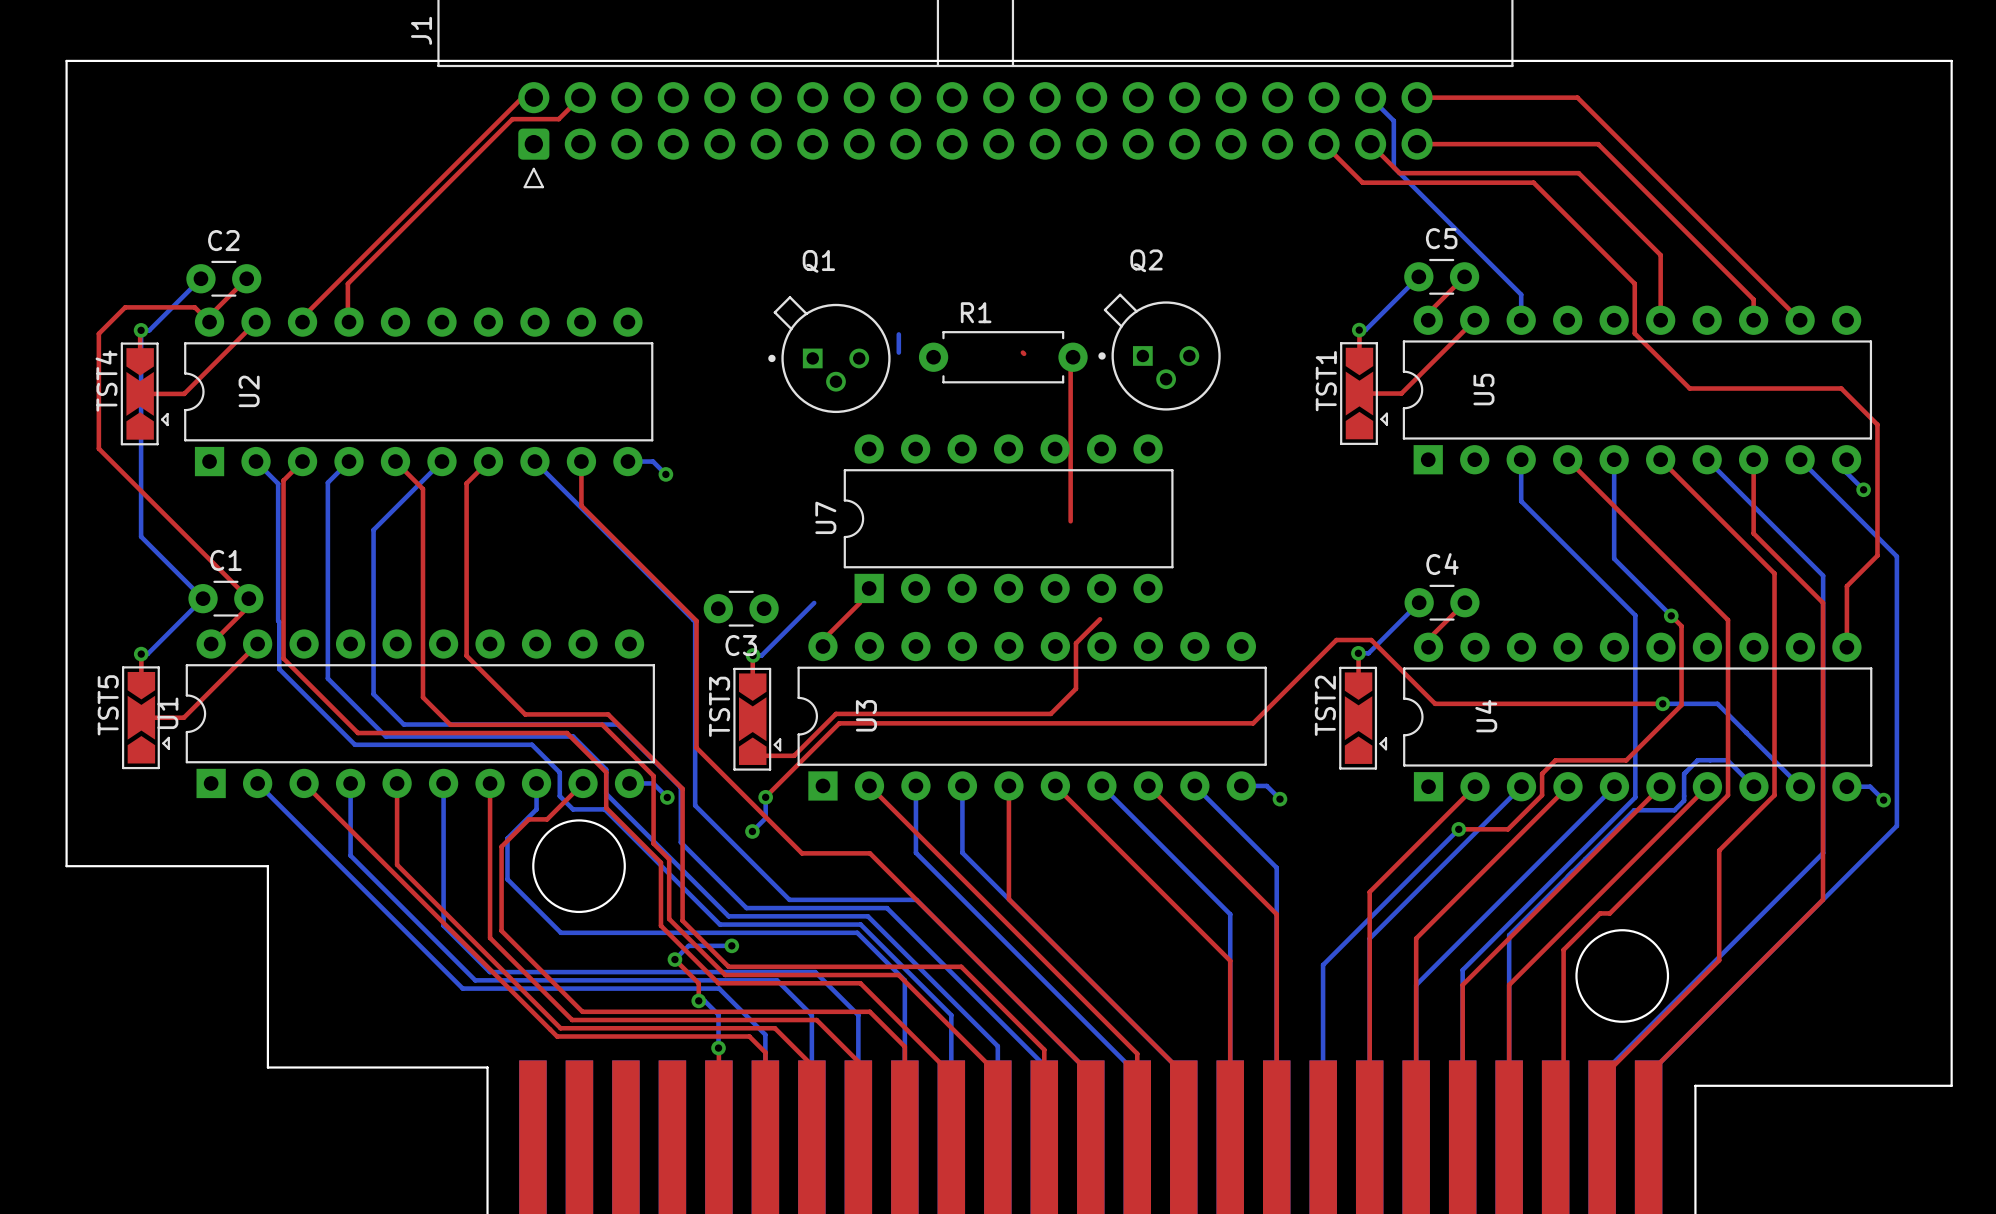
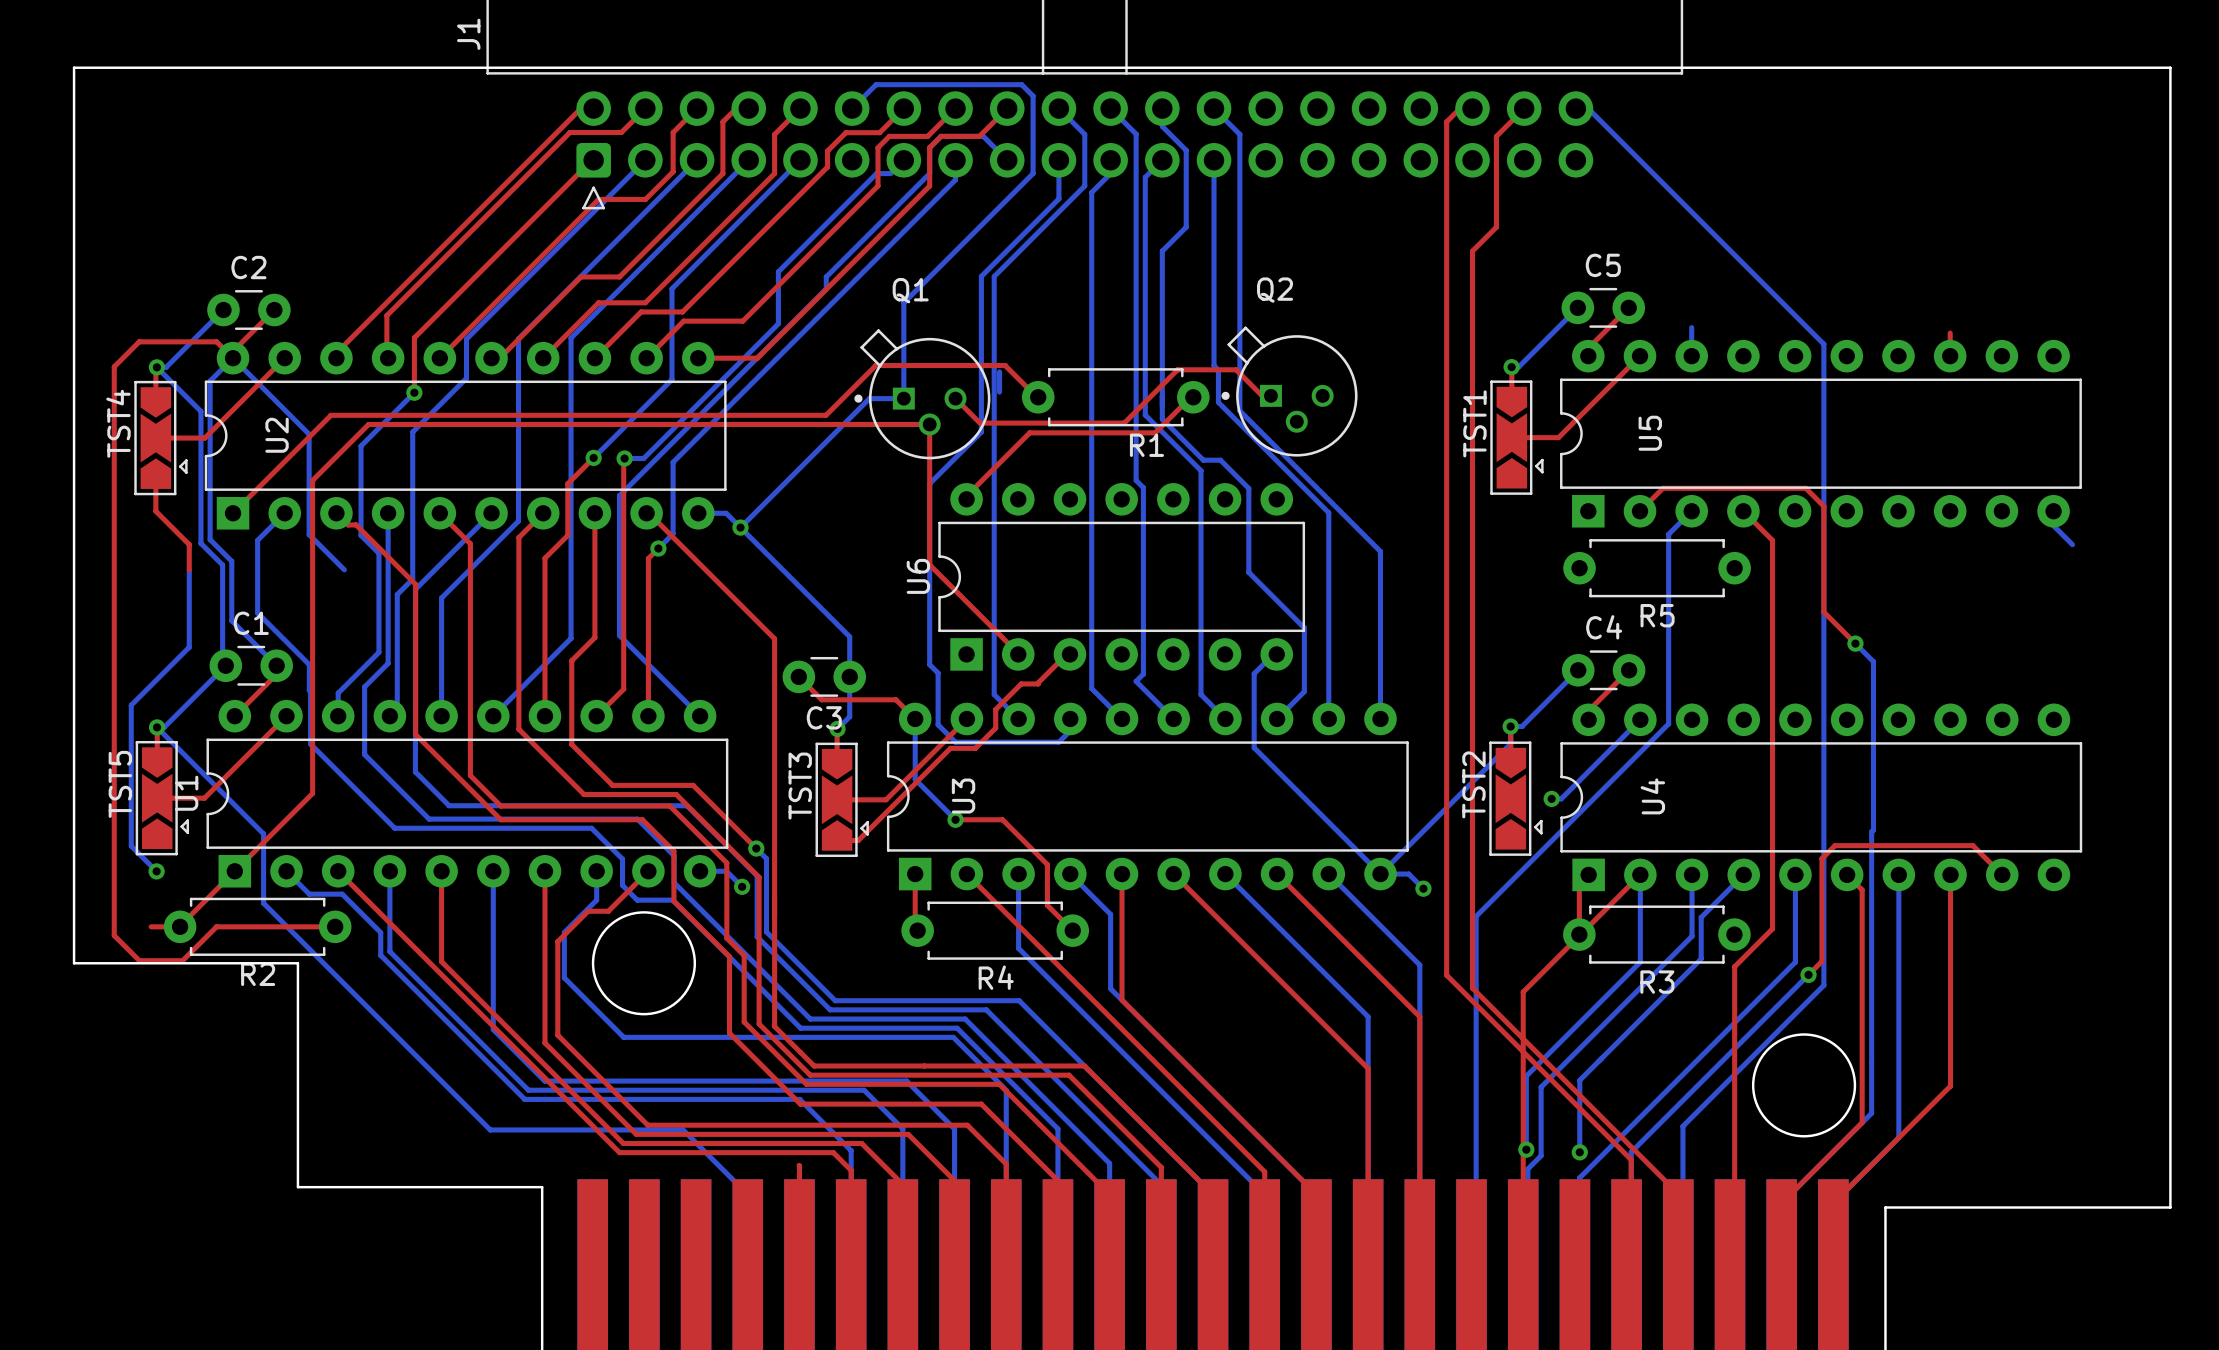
top track: none -> (697, 108) (673, 132) (673, 171) (645, 199) (598, 199) (439, 358)
top track: none -> (748, 108) (736, 108) (722, 121) (722, 173) (619, 276) (580, 276) (499, 358) (491, 358)
top track: none -> (800, 108) (774, 134) (774, 173) (645, 302) (598, 302) (543, 358)
top track: none -> (903, 108) (879, 132) (845, 132) (827, 151) (827, 166) (682, 311) (641, 311) (594, 358)
top track: none -> (955, 108) (927, 136) (889, 136) (877, 147) (877, 185) (742, 321) (683, 321) (646, 358)
top track: none -> (1007, 108) (979, 136) (941, 136) (929, 147) (929, 185) (757, 358) (698, 358)
bottom track: none -> (1058, 108) (1084, 134) (1084, 185) (994, 276) (994, 694) (1018, 718)
bottom track: none -> (1110, 108) (1136, 134) (1136, 480) (1143, 487) (1143, 674) (1136, 681) (1173, 718)
bottom track: none -> (1162, 108) (1162, 126) (1186, 150) (1186, 227) (1162, 251) (1162, 419) (1203, 460) (1220, 460) (1248, 488) (1248, 572) (1304, 627) (1304, 691) (1277, 718)
bottom track: none -> (1214, 108) (1239, 134) (1239, 410) (1380, 551) (1380, 718)
top track: none -> (1472, 108) (1459, 108) (1446, 121) (1446, 975) (1631, 1159) (1631, 1295)
top track: none -> (1524, 108) (1496, 136) (1496, 227) (1472, 251) (1472, 988) (1682, 1198) (1682, 1295)
bottom track: (1370, 97) (1393, 120) (1393, 167) (1521, 294) -> none
top track: (1417, 97) (1577, 97) (1800, 320) -> none
bottom track: none -> (1575, 108) (1588, 108) (1823, 344) (1823, 985) (1682, 1126) (1682, 1295)
top track: none -> (593, 160) (414, 337) (414, 392)
bottom track: none -> (645, 160) (466, 339) (466, 378) (412, 432) (412, 579) (397, 594) (397, 708) (389, 716)
bottom track: none -> (697, 160) (518, 338) (518, 521) (441, 598) (441, 716)
bottom track: none -> (748, 160) (571, 338) (571, 638) (493, 716)
bottom track: none -> (800, 160) (672, 288) (672, 379) (593, 457)
bottom track: none -> (903, 160) (890, 173) (876, 173) (778, 271) (778, 323) (643, 458) (624, 458)
bottom track: none -> (955, 160) (955, 179) (673, 462) (673, 533) (658, 548)
bottom track: none -> (1007, 160) (983, 136) (941, 136) (929, 147) (929, 173) (826, 276) (826, 288) (619, 495) (619, 635) (700, 716)
bottom track: none -> (1058, 160) (1058, 198) (981, 276) (981, 432) (929, 483) (929, 664) (938, 673) (938, 724) (955, 742) (1058, 742) (1070, 730) (1070, 718)
bottom track: none -> (1110, 160) (1110, 173) (1091, 192) (1091, 688) (1122, 718)
bottom track: none -> (1162, 160) (1145, 177) (1145, 415) (1201, 470) (1201, 694) (1225, 718)
bottom track: none -> (1214, 160) (1214, 365) (1218, 370) (1218, 402) (1328, 512) (1328, 718)
top track: (1324, 144) (1362, 182) (1533, 182) (1634, 283) (1634, 333) (1689, 388) (1841, 388) (1877, 424) (1877, 555) (1846, 586) (1846, 647) -> none
top track: (1370, 144) (1399, 173) (1578, 173) (1660, 255) (1660, 320) -> none
top track: (1417, 144) (1598, 144) (1753, 299) -> none
R1 name position: R1 (976, 312) -> R1 (1146, 445)
top track: (102, 329) (98, 333) (98, 448) (248, 598) -> (114, 366) (114, 935) (139, 960) (182, 960) (216, 926) (335, 926)
bottom track: (141, 330) (141, 536) (200, 595) -> (156, 367) (200, 411) (200, 543) (222, 565) (222, 662)
top track: (1022, 352) (1024, 353) -> none
bottom track: none -> (414, 392) (361, 446) (361, 535) (378, 553) (378, 652) (338, 693) (338, 716)
via: none -> (414, 392)
top track: (1070, 353) (1070, 521) -> none
top track: none -> (1270, 395) (1262, 395) (1236, 369) (1177, 369) (1124, 423) (980, 423) (955, 398)
top track: none -> (1036, 396) (1005, 365) (875, 365) (826, 415) (331, 415) (233, 513)
top track: none -> (1191, 396) (1155, 432) (1029, 432) (965, 497)
top track: none -> (593, 457) (567, 483) (567, 535) (544, 558) (544, 716)
via: none -> (593, 457)
top track: none -> (624, 458) (623, 689) (596, 716)
via: none -> (624, 458)
top track: none -> (155, 478) (155, 511) (189, 544) (189, 569)
top track: none -> (1640, 511) (1662, 488) (1805, 488) (1823, 506) (1823, 612) (1855, 643)
bottom track: (1521, 459) (1521, 501) (1635, 615) (1635, 797) (1462, 970) (1462, 1161) -> (1691, 511) (1668, 534) (1668, 723) (1476, 916) (1476, 1295)
bottom track: (1614, 459) (1614, 558) (1671, 615) -> none
top track: (1660, 459) (1774, 573) (1774, 795) (1719, 850) (1719, 960) (1602, 1077) (1602, 1161) -> none
bottom track: (1707, 459) (1823, 575) (1823, 853) (1602, 1074) (1602, 1161) -> none
top track: (1753, 459) (1753, 533) (1823, 602) (1823, 899) (1648, 1074) (1648, 1161) -> none
bottom track: (1800, 459) (1896, 556) (1896, 825) (1648, 1074) (1648, 1161) -> none
bottom track: (256, 461) (278, 483) (278, 597) -> (284, 513) (257, 540) (257, 612) (309, 664)
top track: (302, 461) (283, 480) (283, 658) (358, 733) (566, 733) (606, 772) (606, 807) (660, 862) (660, 925) (718, 983) (860, 983) (951, 1074) -> (336, 513) (348, 524) (356, 524) (415, 584) (415, 734) (500, 819) (642, 819) (673, 851) (673, 901) (729, 956) (729, 1033) (800, 1104) (981, 1104) (1057, 1180) (1057, 1194)
bottom track: (349, 461) (327, 482) (327, 617) -> (388, 513) (388, 663) (364, 686)
top track: none -> (594, 513) (594, 637) (571, 660) (571, 744) (612, 785) (693, 785) (756, 848)
bottom track: (534, 461) (693, 620) -> none
top track: (581, 461) (581, 505) (696, 620) -> (646, 513) (649, 513) (774, 638) (774, 690)
top track: (1593, 485) (1728, 620) (1728, 795) (1609, 913) (1600, 913) (1563, 949) (1563, 1153) -> (1772, 540) (1772, 928) (1734, 966) (1734, 1295)
via: (1863, 489) -> none
top track: none -> (658, 548) (648, 558) (648, 716)
via: none -> (658, 548)
R5: none -> (1657, 568)
bottom track: none -> (189, 569) (189, 647) (131, 705) (131, 846) (156, 871)
bottom track: none -> (344, 569) (309, 534) (309, 434) (233, 358) (210, 381) (210, 539) (231, 561) (231, 620) (276, 665)
U7 name: U7 (825, 517) -> U6 (918, 576)
bottom track: none -> (1851, 640) (1873, 661) (1871, 1113) (1786, 1198) (1786, 1295)
top track: none -> (1017, 652) (929, 564) (929, 424) (368, 424) (312, 480) (312, 793) (179, 926) (151, 926)
bottom track: none -> (1275, 652) (1254, 673) (1254, 747) (1380, 874) (1510, 743) (1510, 726)
bottom track: (814, 602) (761, 655) (753, 655) -> (852, 108) (876, 84) (1021, 84) (1033, 96) (1033, 173) (903, 302) (903, 398) (869, 398) (740, 527) (849, 636) (849, 716) (837, 728)
top track: (859, 602) (822, 639) -> none
top track: none -> (798, 676) (821, 699) (896, 699) (915, 718)
top track: (1671, 615) (1681, 626) (1681, 705) (1626, 760) (1555, 760) (1542, 773) (1542, 795) (1508, 829) (1458, 829) -> none
via position: (1671, 615) -> (1855, 643)
top track: (1100, 619) (1075, 643) (1075, 688) (1050, 713) (835, 713) (794, 755) (771, 755) -> (1068, 652) (1038, 683) (1021, 683) (995, 709) (995, 728) (975, 748) (950, 748) (858, 840)
bottom track: (693, 620) (695, 621) (695, 805) (789, 899) -> (756, 848) (766, 858) (766, 931) (835, 1000) (877, 1000)
bottom track: none -> (915, 718) (915, 779) (955, 819)
top track: none -> (966, 718) (886, 799) (837, 799)
bottom track: none -> (1640, 719) (1561, 798) (1551, 798)
bottom track: none -> (157, 727) (263, 833) (263, 903) (490, 1129) (683, 1129) (747, 1194) (747, 1291)
top track: (1662, 703) (1435, 703) (1371, 640) (1336, 640) (1253, 723) (839, 723) (765, 796) -> none
bottom track: (1662, 703) (1717, 703) (1800, 786) -> none
via: (1662, 703) -> none
via: none -> (1551, 798)
top track: none -> (955, 819) (1002, 819) (1047, 864) (1047, 905) (1072, 930)
via: none -> (955, 819)
top track: (696, 747) (802, 853) (869, 853) (975, 958) -> (774, 831) (774, 1026) (814, 1066) (1084, 1066)
via: none -> (756, 848)
via: none -> (156, 871)
top track: none -> (915, 874) (915, 928) (917, 930)
bottom track: (962, 785) (962, 852) (998, 889) -> (1070, 874) (1110, 914) (1110, 988)
top track: none -> (1588, 874) (1579, 884) (1579, 934)
bottom track: none -> (1640, 874) (1640, 962) (1526, 1076) (1526, 1149)
bottom track: (1521, 786) (1369, 938) (1369, 1161) -> (1692, 874) (1692, 936) (1541, 1087) (1541, 1155) (1527, 1169) (1527, 1295)
top track: (1567, 786) (1416, 938) (1416, 1161) -> none
bottom track: none -> (1743, 874) (1701, 917) (1701, 958) (1579, 1080) (1579, 1152)
bottom track: (1614, 786) (1416, 985) (1416, 1161) -> (1795, 874) (1795, 962) (1579, 1178) (1579, 1295)
top track: (1660, 786) (1462, 985) (1462, 1161) -> (1847, 874) (1862, 889) (1862, 1122) (1786, 1198) (1786, 1295)
top track: (1707, 786) (1509, 985) (1509, 1161) -> none
bottom track: none -> (1898, 874) (1898, 1137) (1838, 1198) (1838, 1295)
top track: none -> (1950, 874) (1950, 1086) (1838, 1198) (1838, 1295)
bottom track: (1753, 786) (1727, 760) (1697, 760) (1684, 773) (1684, 800) (1674, 810) (1634, 810) (1509, 935) (1509, 1161) -> none
top track: none -> (2002, 874) (1972, 845) (1834, 845) (1821, 858) (1821, 961) (1808, 974)
bottom track: (1846, 786) (1870, 786) (1883, 800) -> none
bottom track: (765, 797) (765, 818) (752, 831) -> none
via: (765, 797) -> none
via: (1883, 800) -> none
bottom track: (278, 804) (462, 988) (471, 988) -> (309, 894) (342, 894) (380, 932) (380, 955) (524, 1099)
bottom track: (1458, 829) (1323, 965) (1323, 1074) -> none
via: (1458, 829) -> none
via: (752, 831) -> none
R2: none -> (257, 926)
R4: none -> (995, 930)
R3: none -> (1656, 934)
bottom track: none -> (1808, 974) (1631, 1152) (1631, 1295)
via: none -> (1808, 974)
bottom track: (731, 945) (688, 945) (674, 959) -> none
via: (731, 945) -> none
top track: (674, 959) (698, 983) (698, 1000) -> none
via: (674, 959) -> none
bottom track: (698, 1000) (704, 1000) (718, 1014) (718, 1048) -> none
via: (698, 1000) -> none
via: none -> (1526, 1149)
via: none -> (1579, 1152)
via: (718, 1048) -> none

